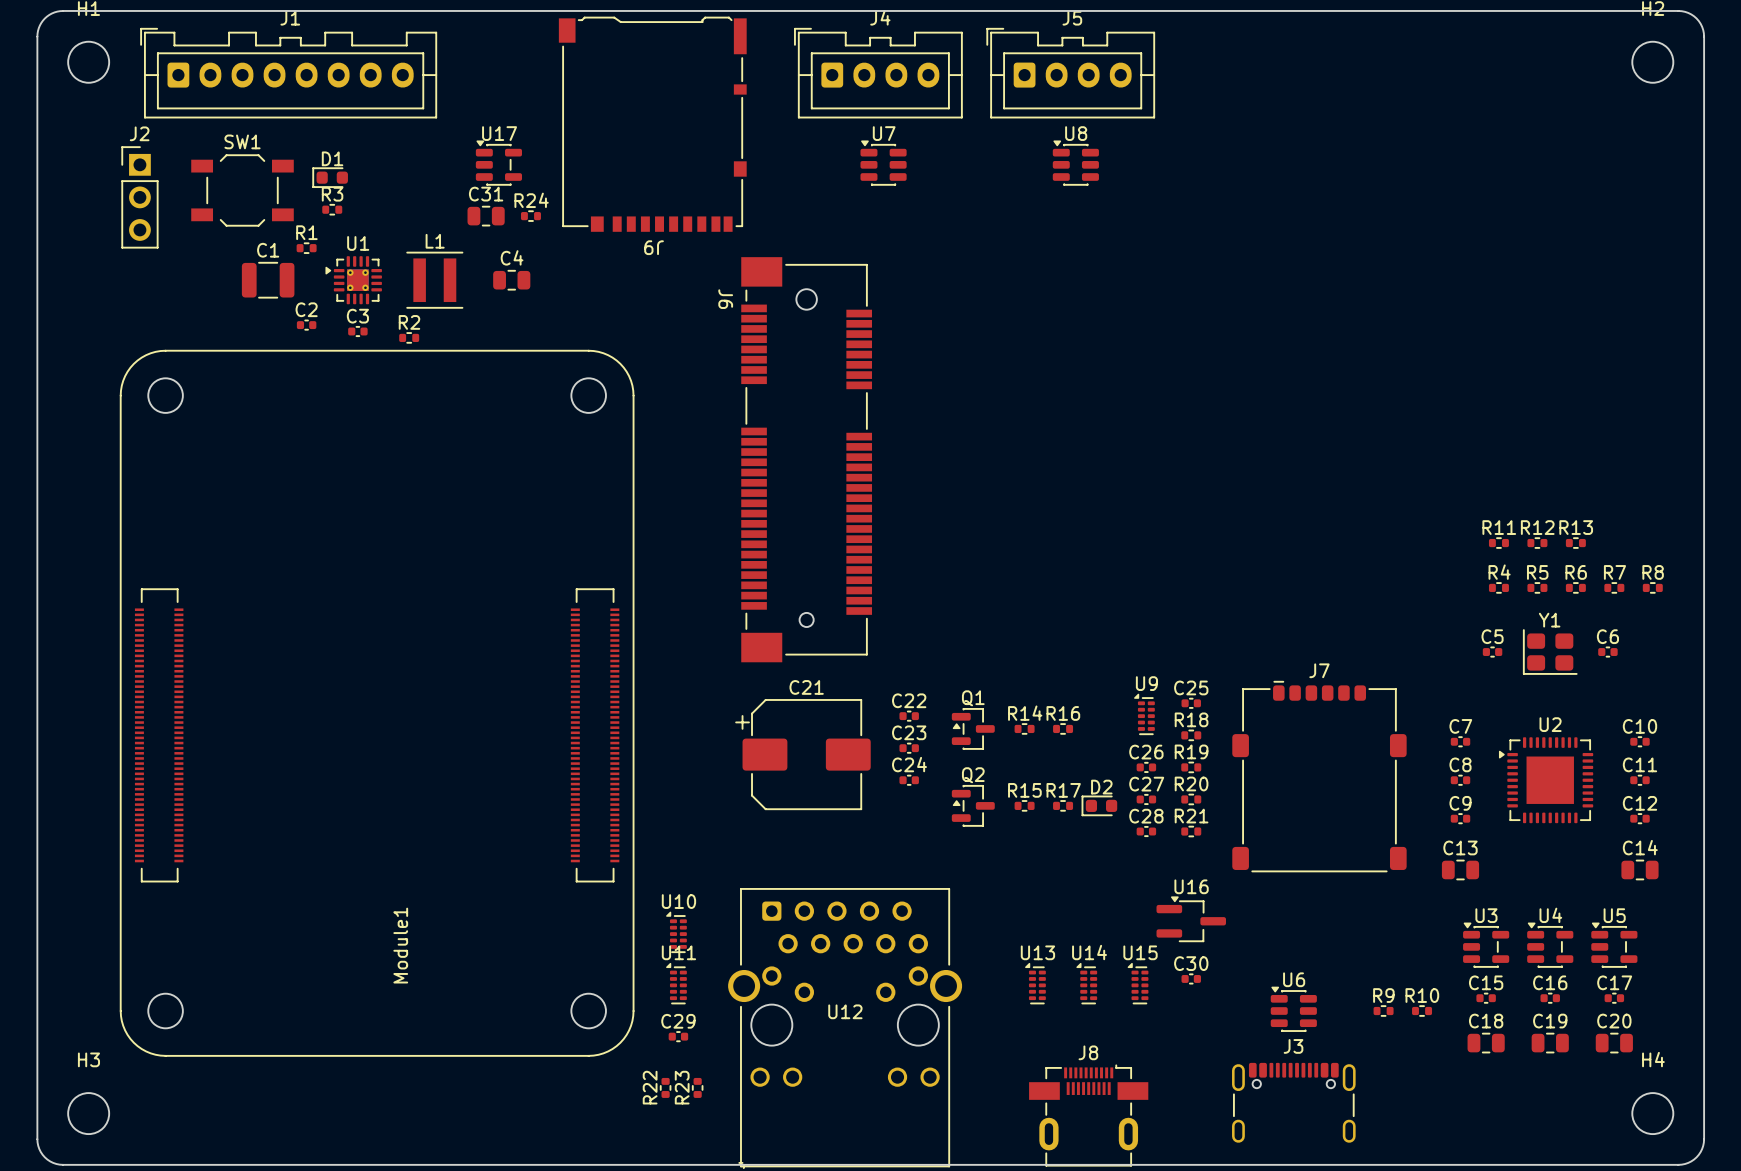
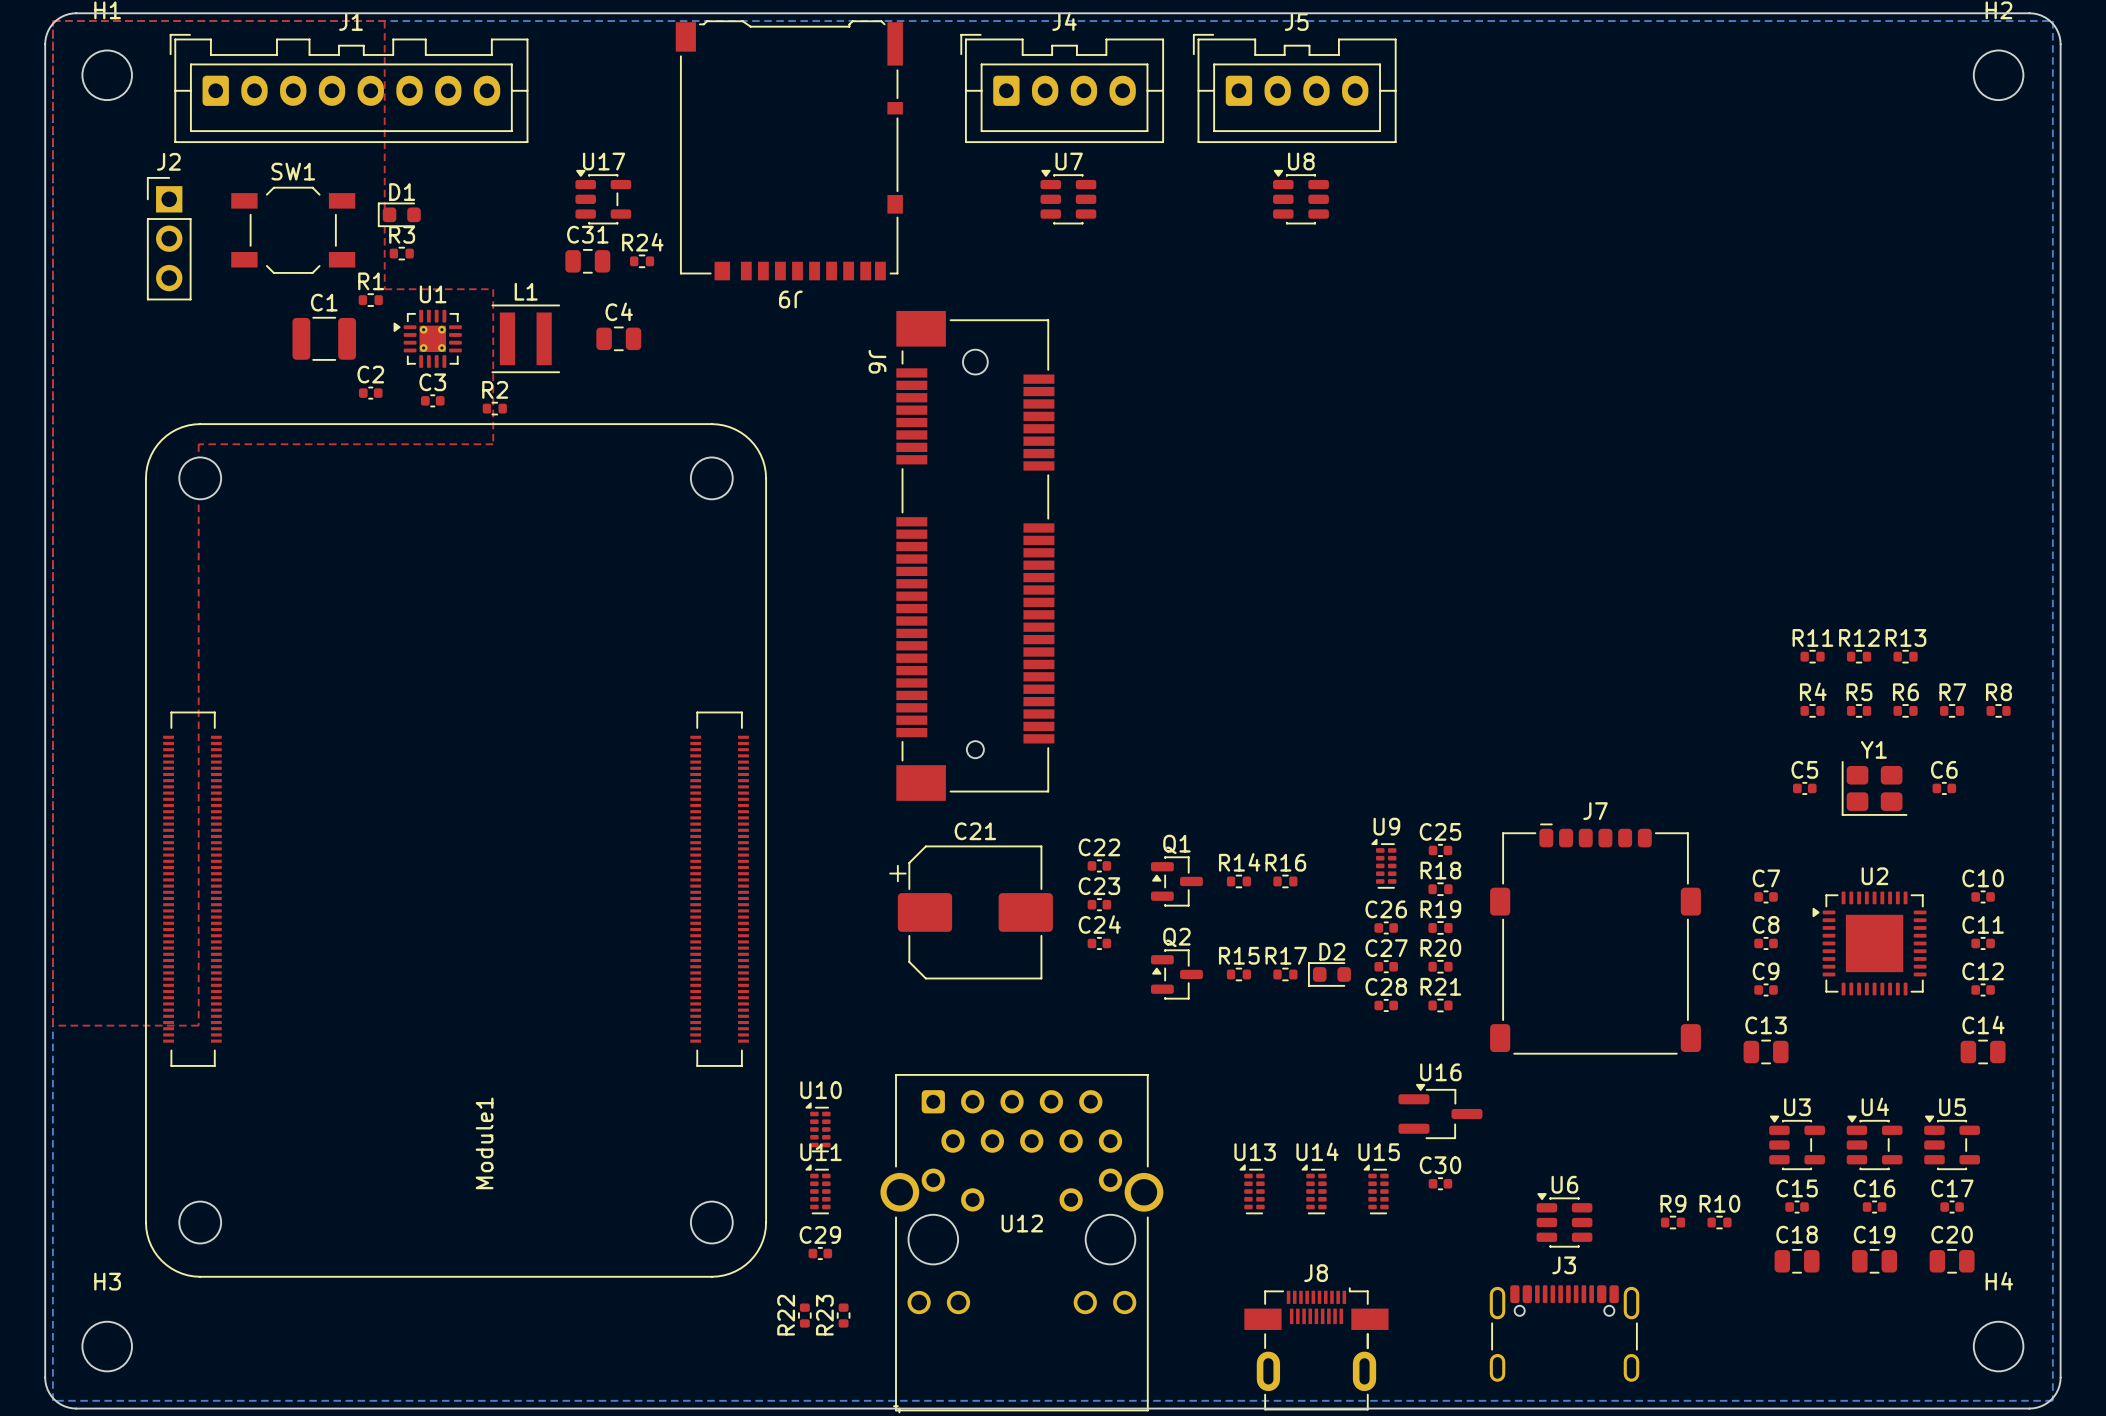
top zone outline: none -> (52, 21) (384, 21) (384, 289) (493, 289) (493, 444) (198, 444) (198, 1025) (52, 1025) (52, 21)
bottom zone outline: none -> (52, 21) (2052, 21) (2052, 1400) (52, 1400) (52, 21)

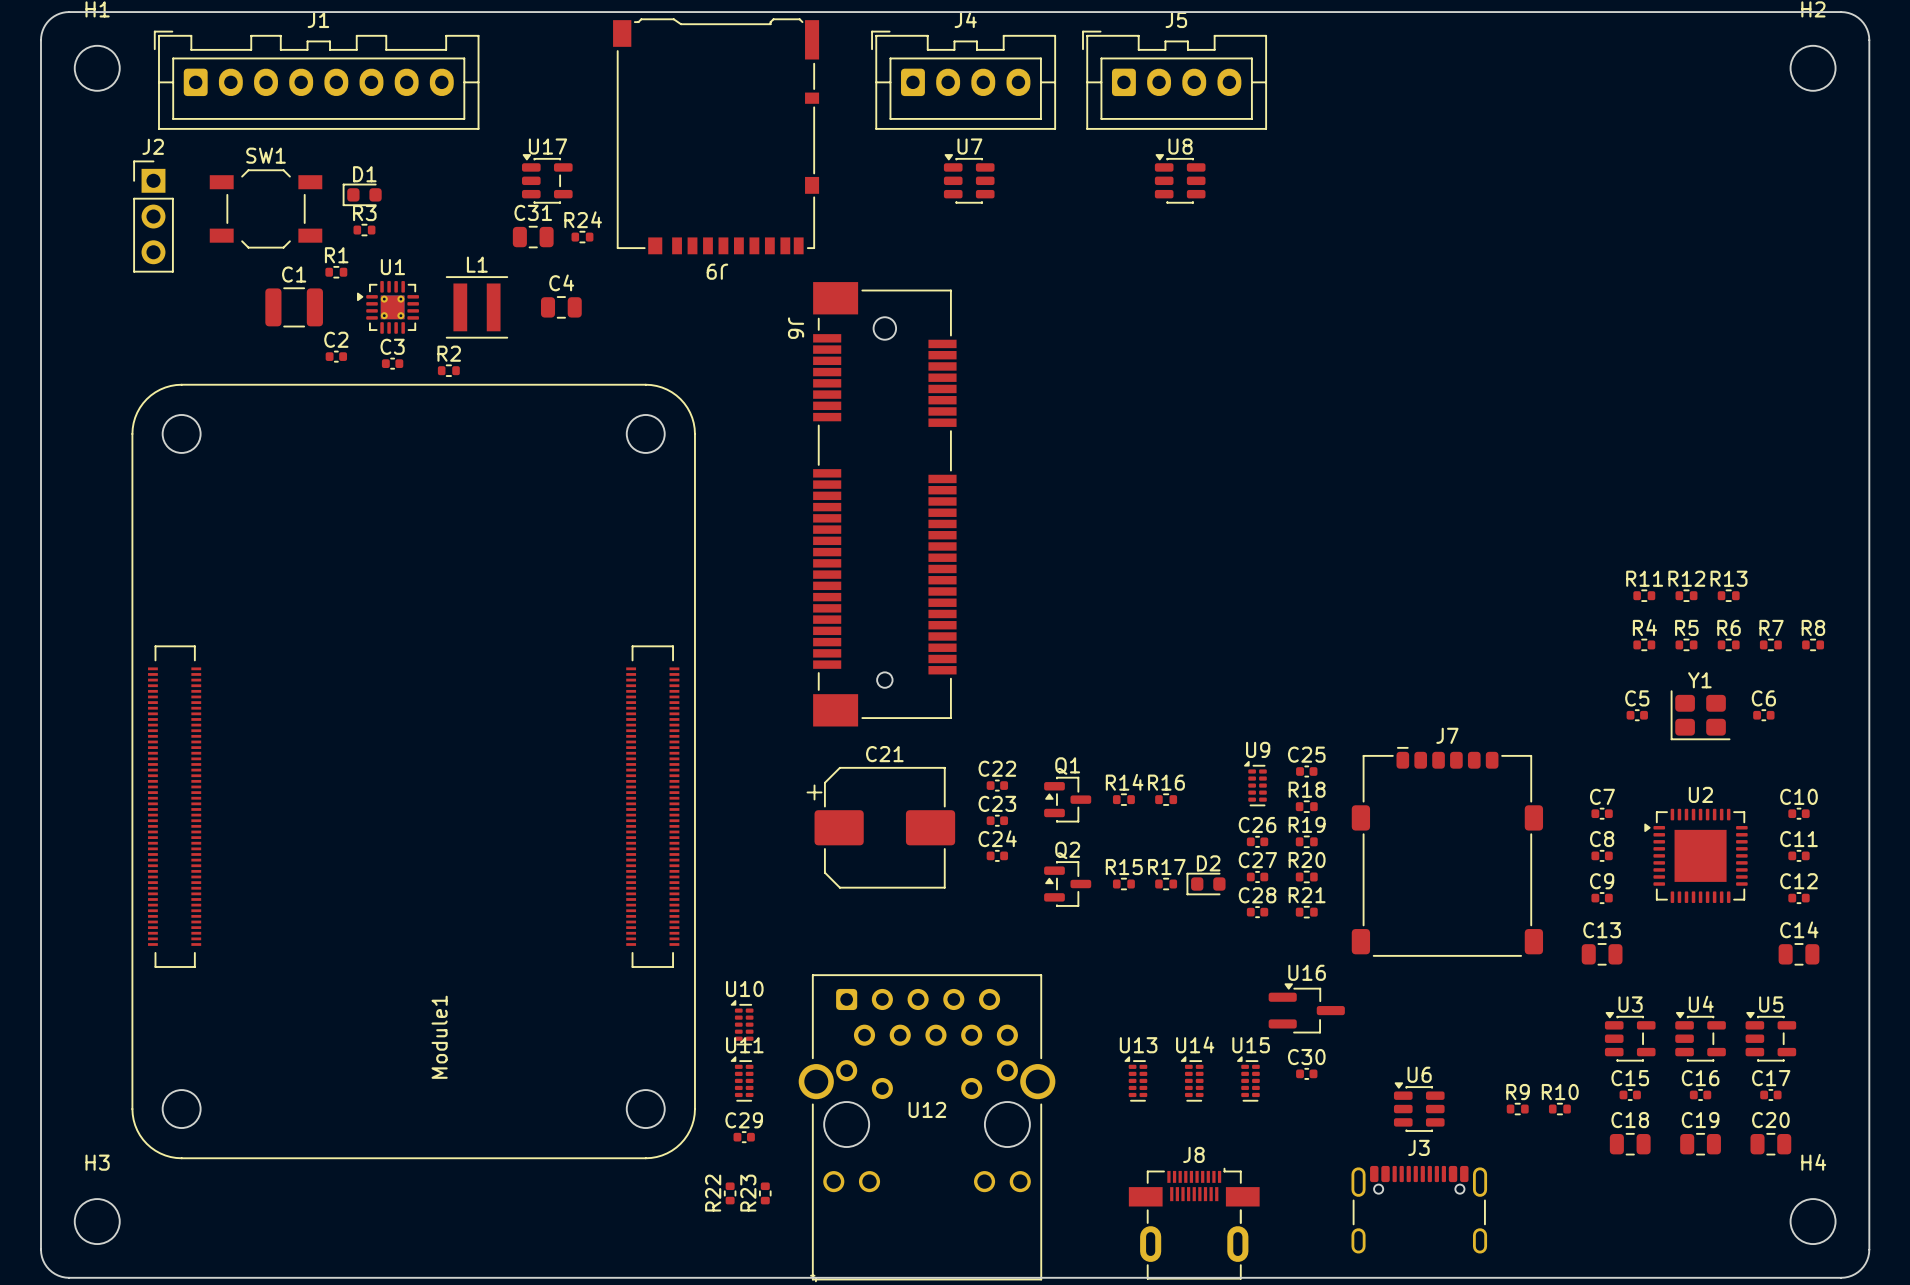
top zone outline: (52, 21) (384, 21) (384, 289) (493, 289) (493, 444) (198, 444) (198, 1025) (52, 1025) (52, 21) -> none
bottom zone outline: (52, 21) (2052, 21) (2052, 1400) (52, 1400) (52, 21) -> none

